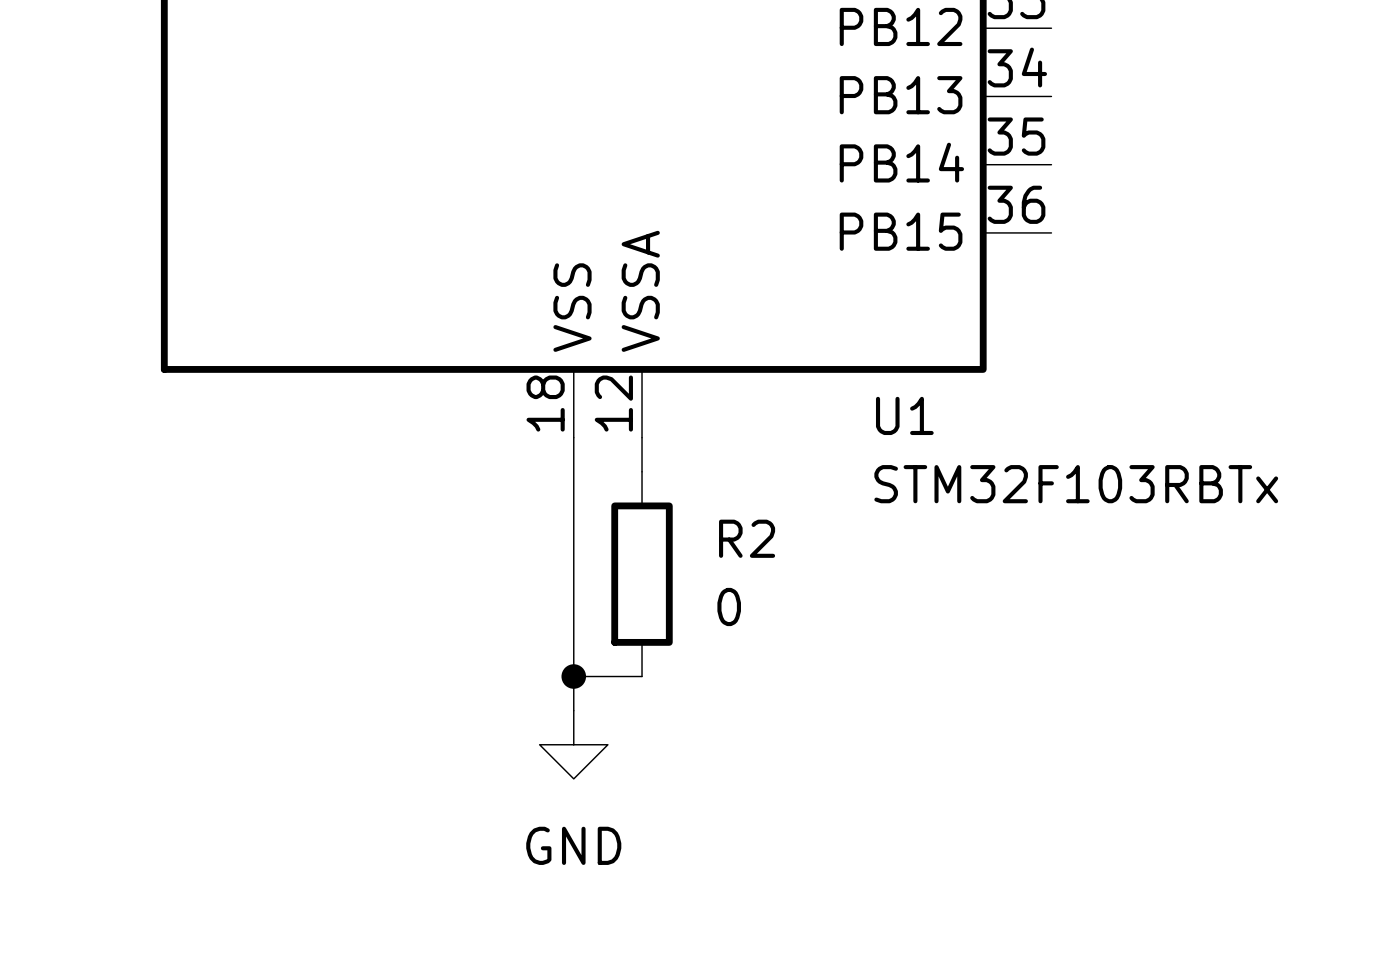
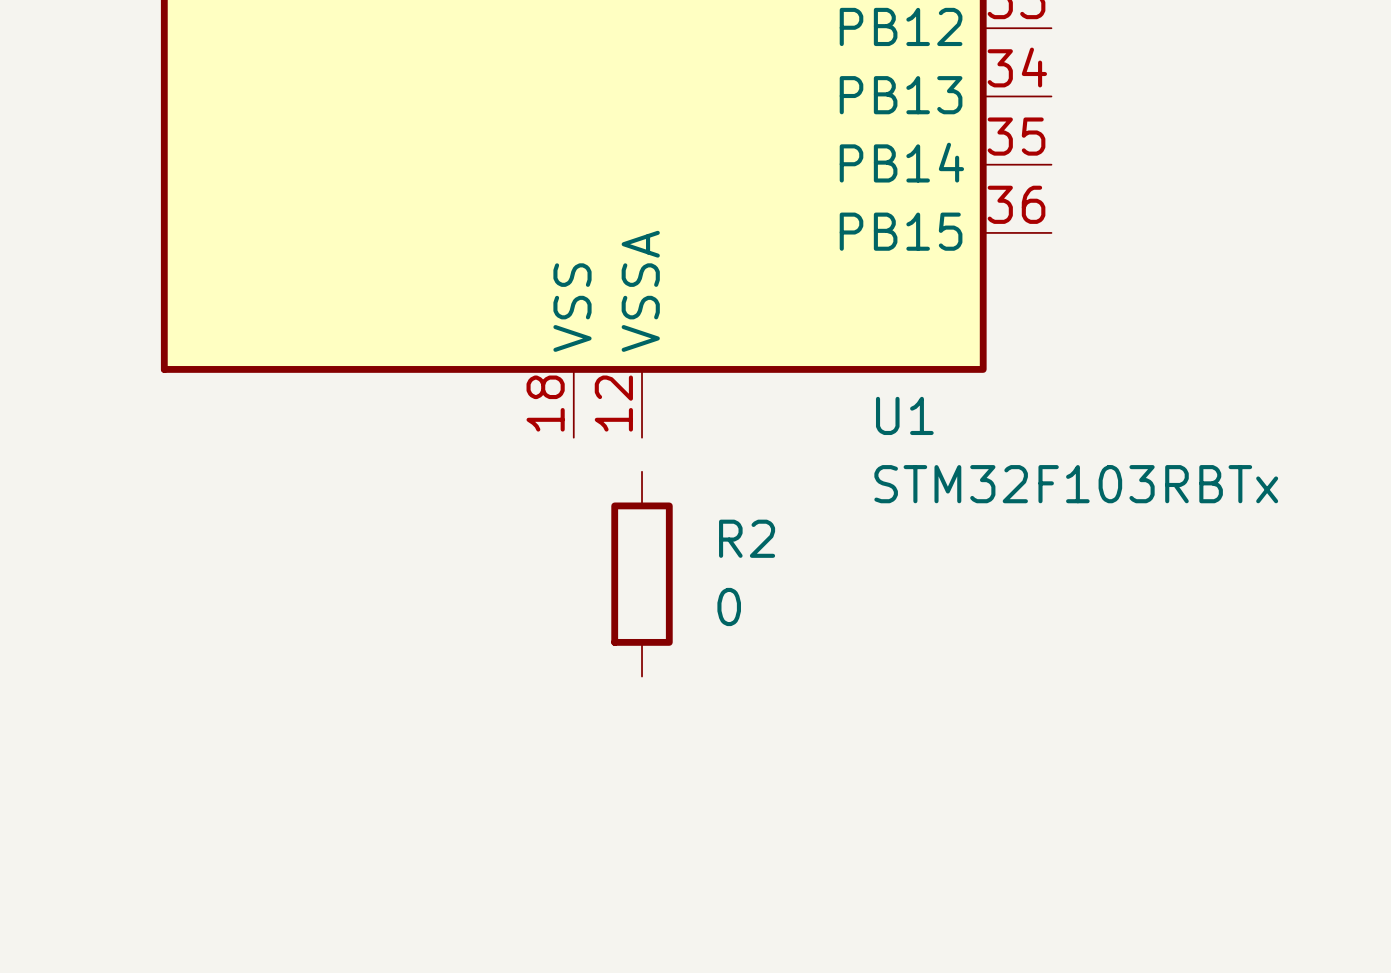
wire: (573, 437) (573, 710) -> none
wire: (642, 437) (642, 471) -> none
wire: (573, 676) (642, 676) -> none
junction: (573, 676) -> none
power symbol: GND (573, 744) -> none

